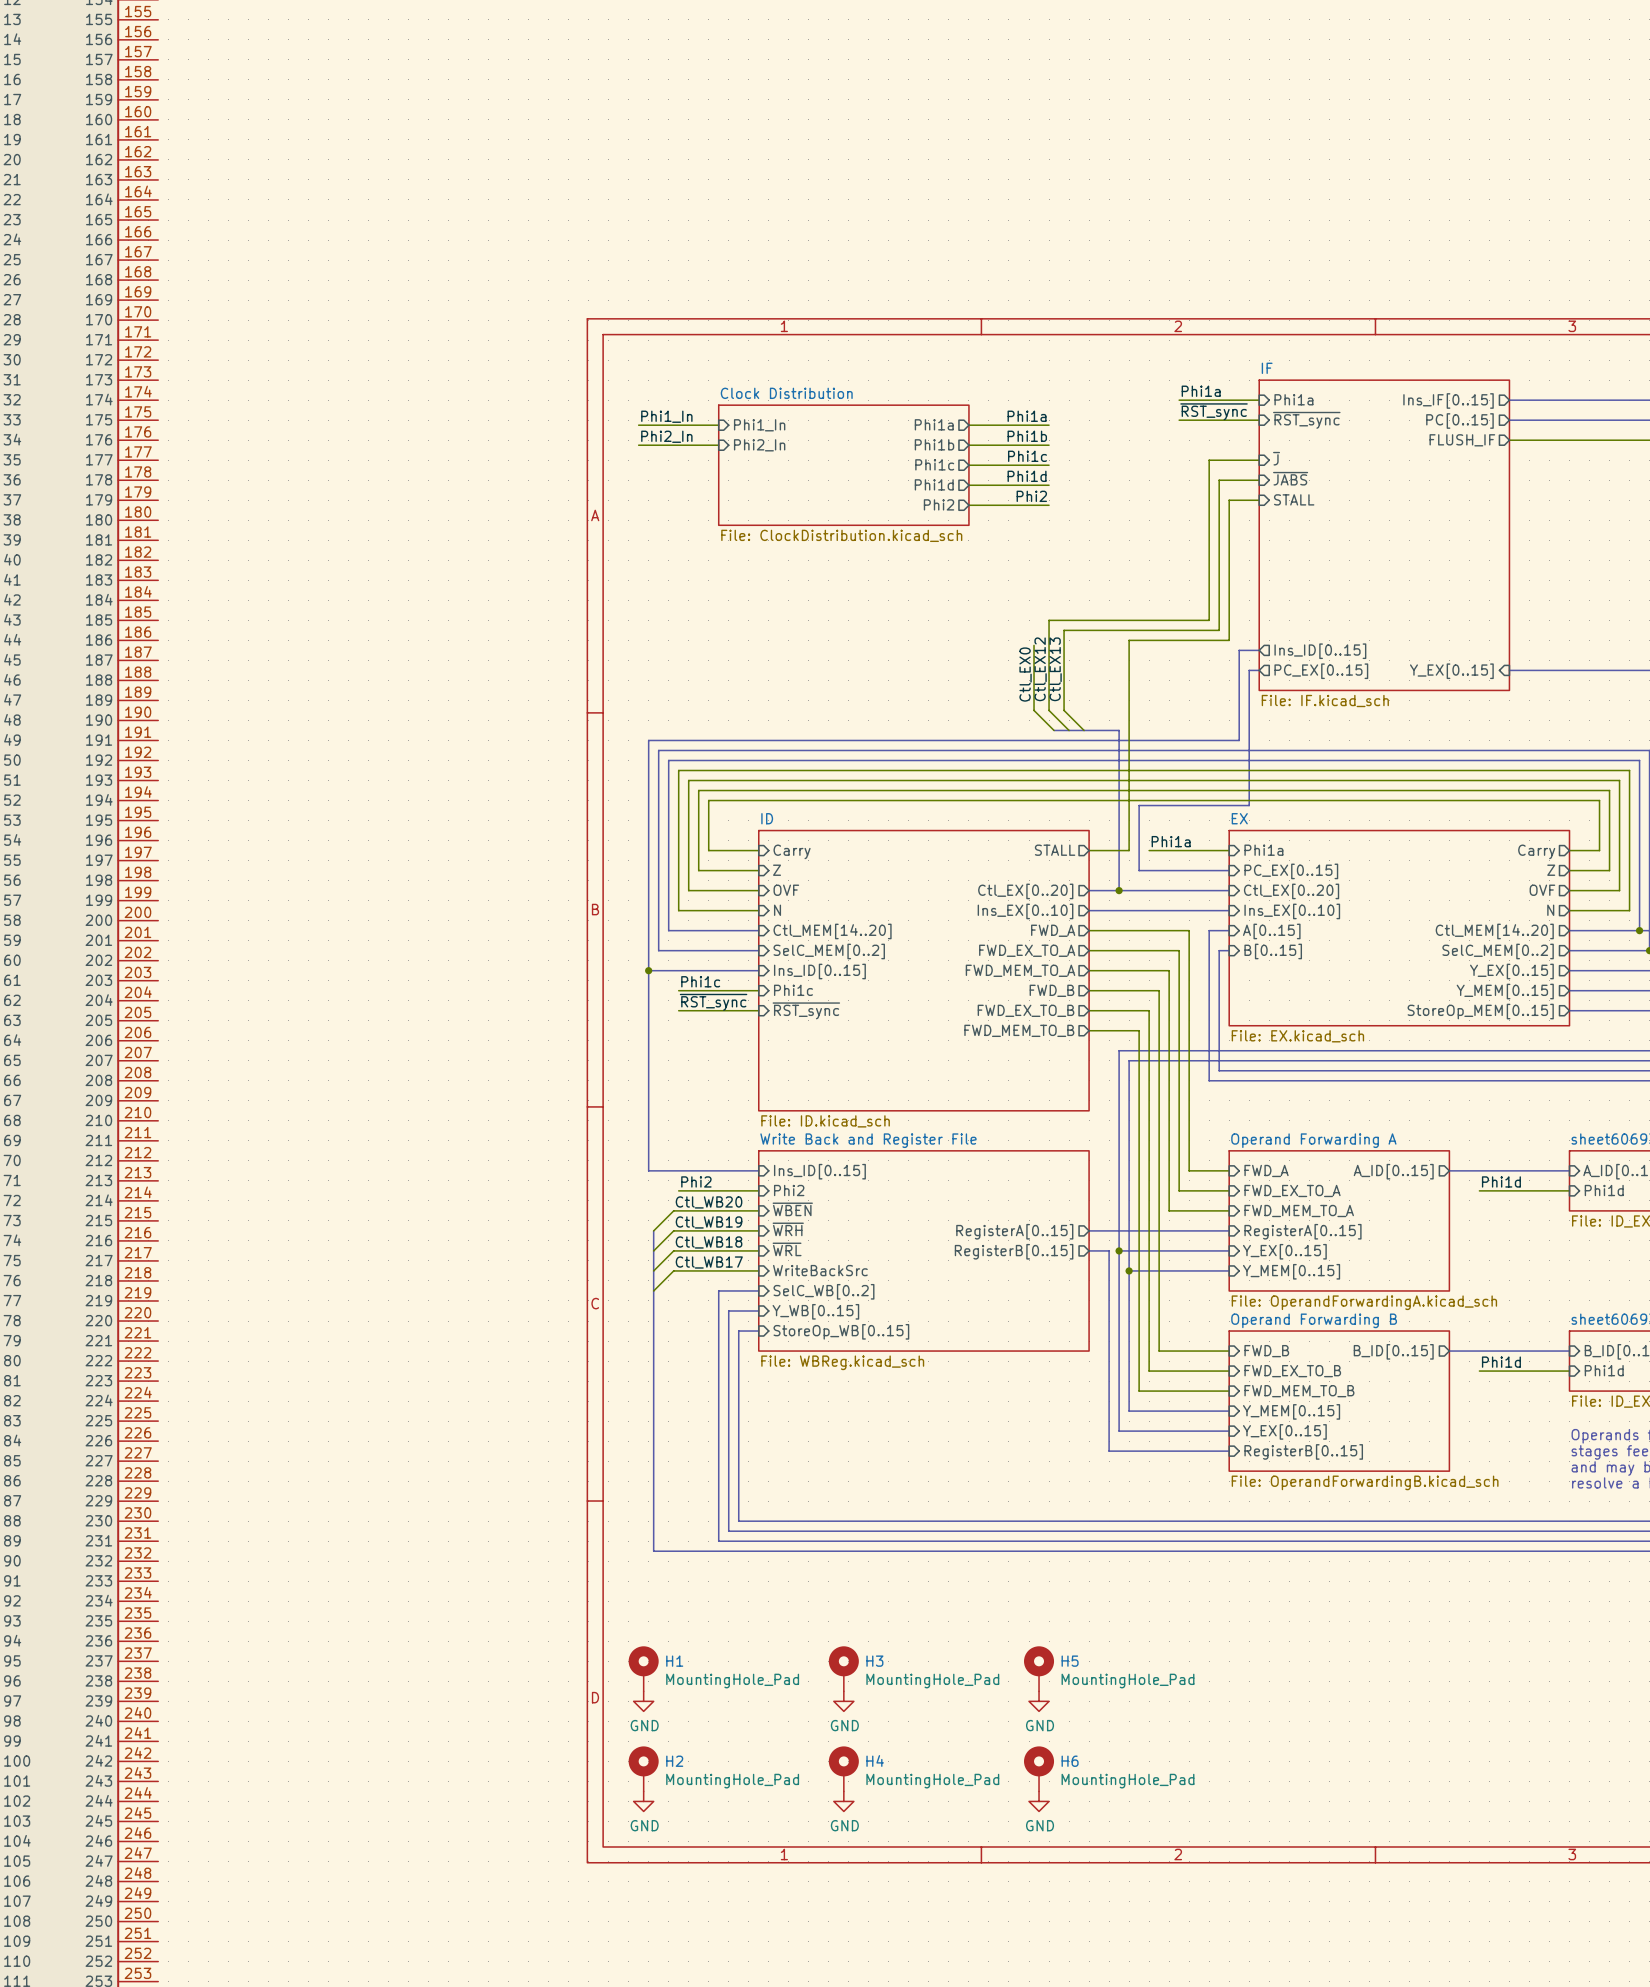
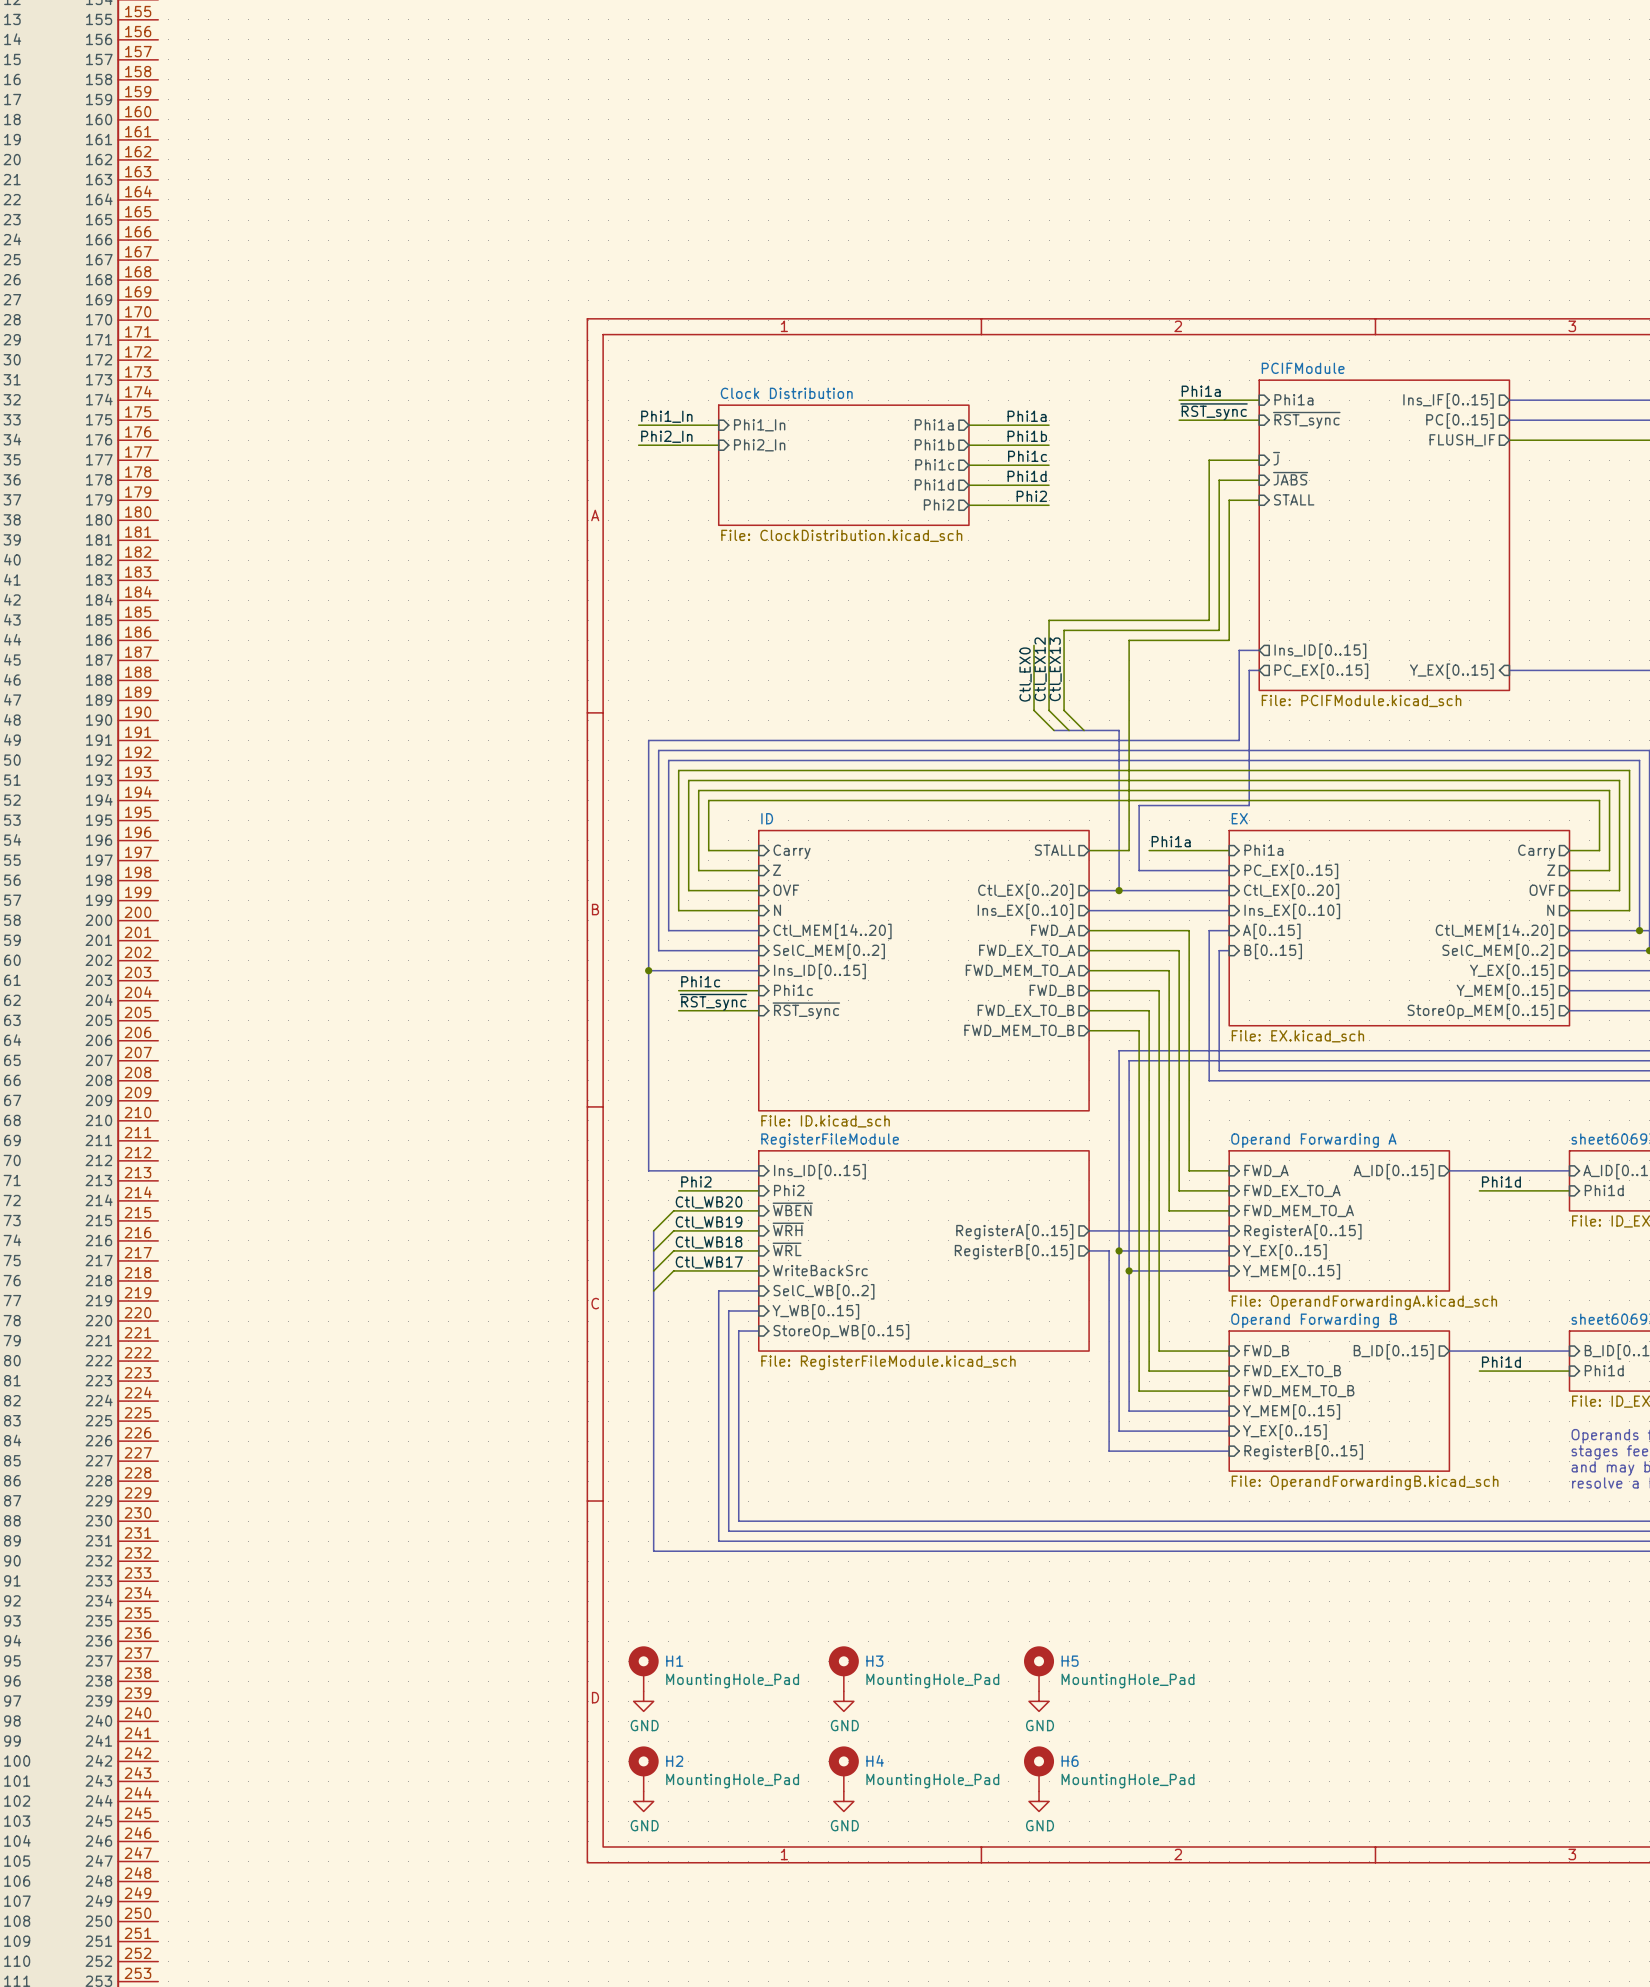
sheet IF: File: IF.kicad_sch (1384, 535) -> none
sheet PCIFModule: none -> File: PCIFModule.kicad_sch (1384, 535)
sheet Write Back and Register File name: Write Back and Register File (868, 1140) -> RegisterFileModule (830, 1140)
sheet Write Back and Register File value: File: WBReg.kicad_sch (842, 1362) -> File: RegisterFileModule.kicad_sch (888, 1362)

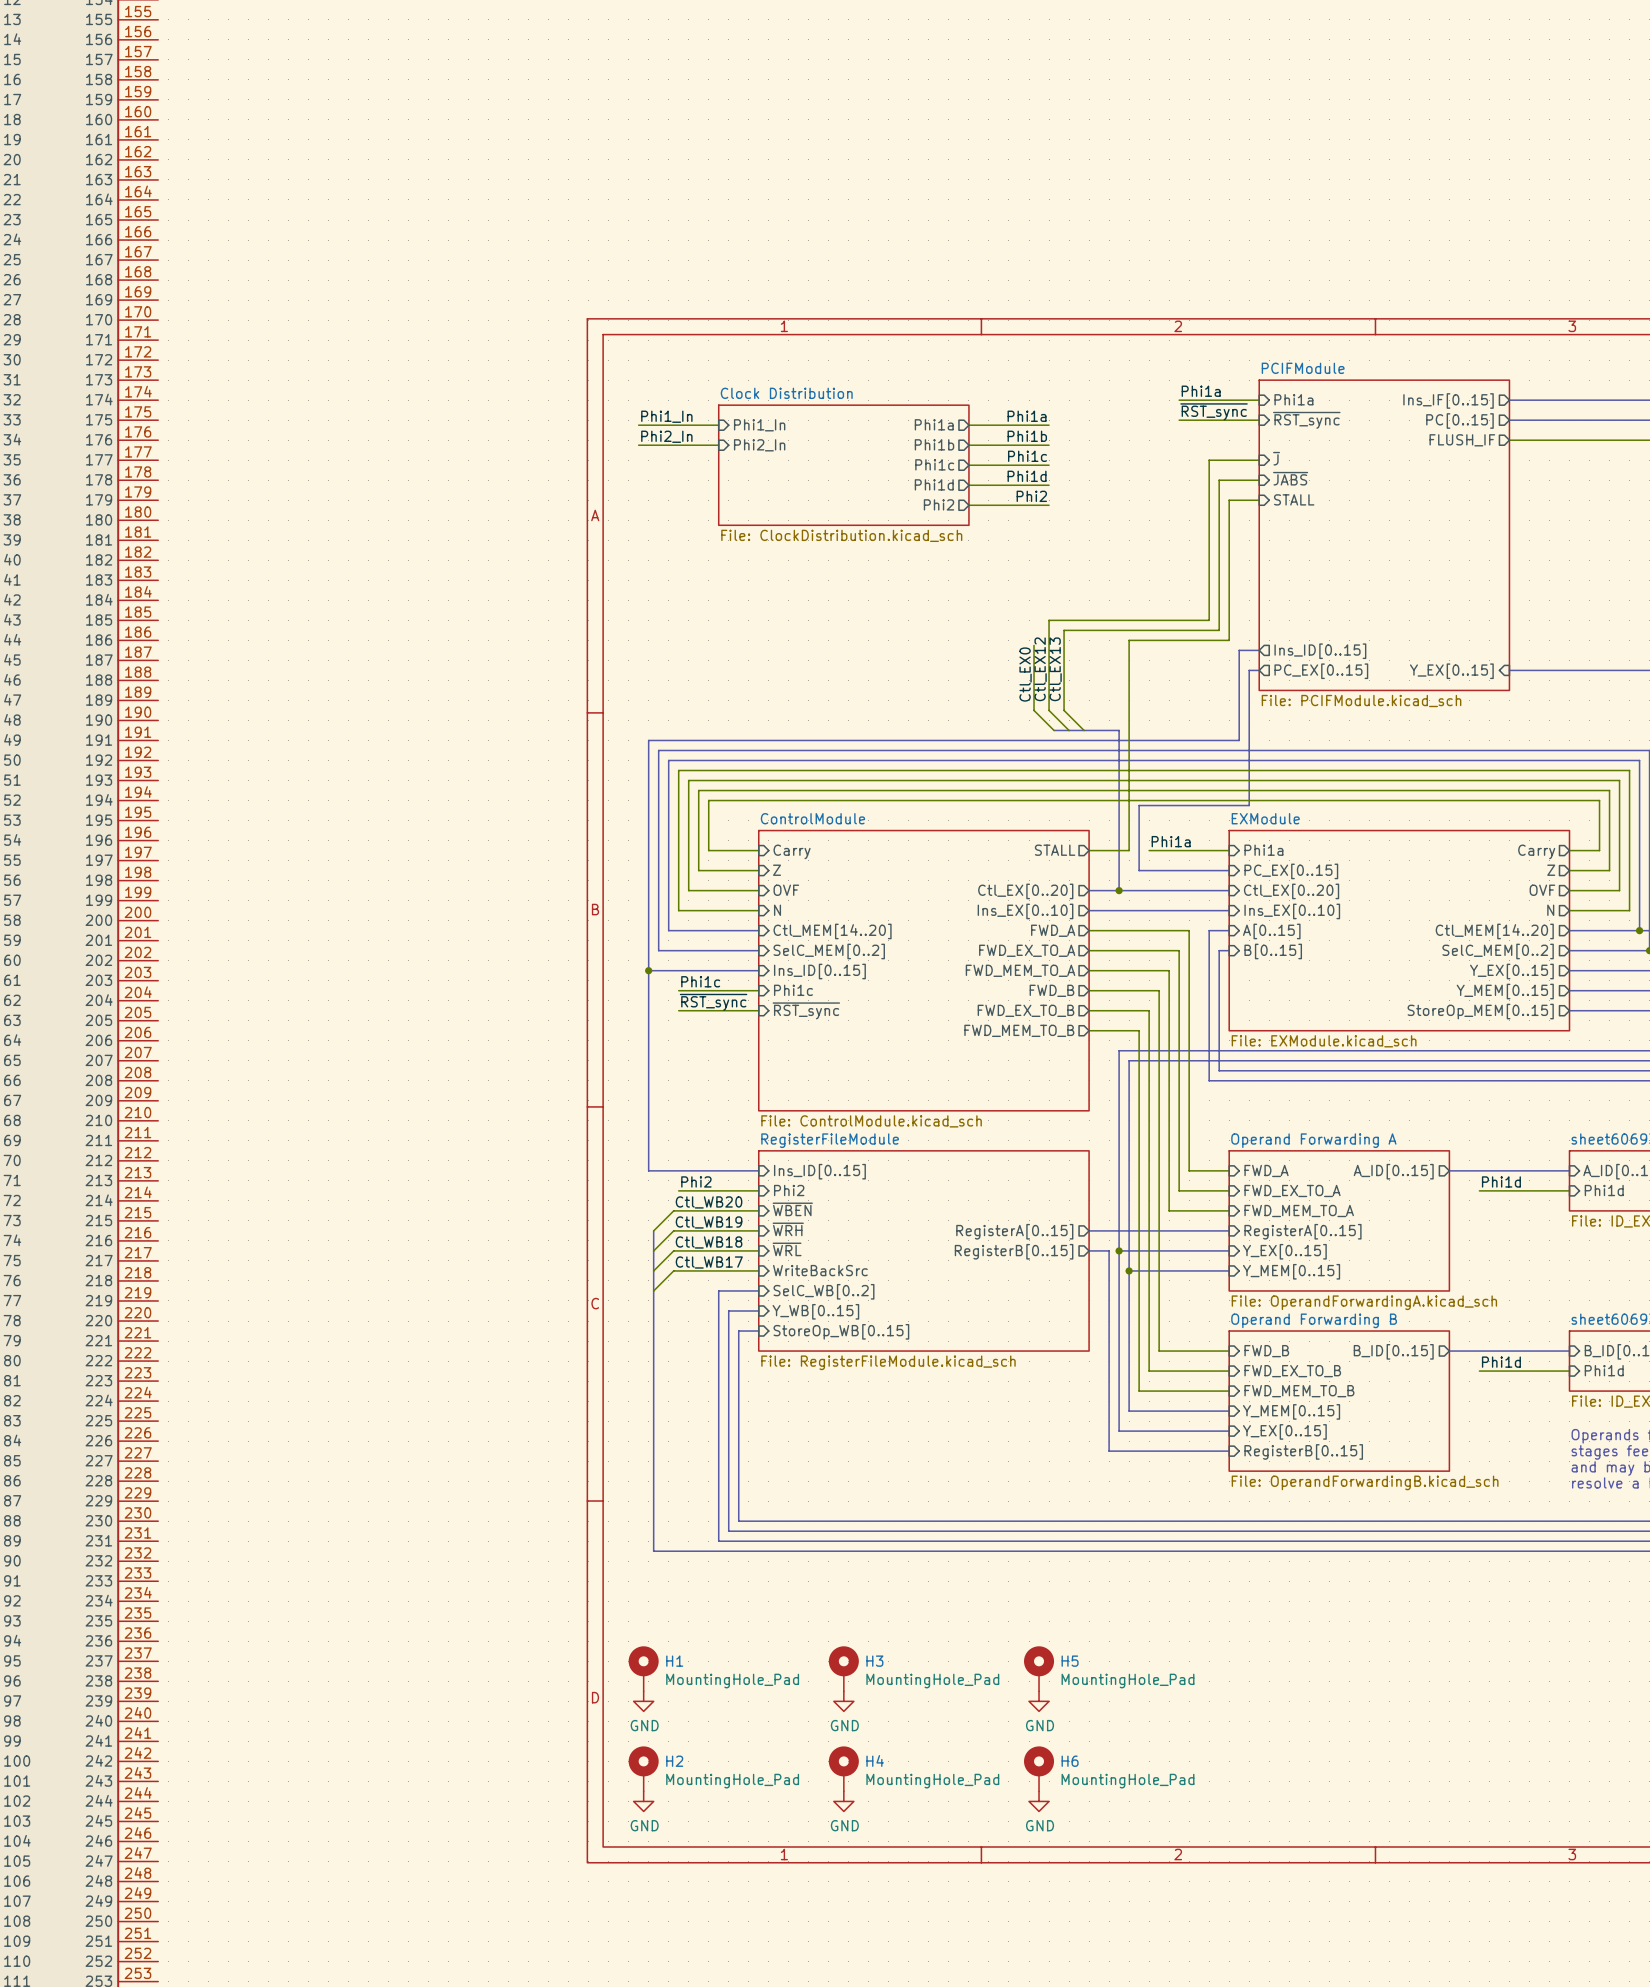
sheet EX: File: EX.kicad_sch (1399, 928) -> none
sheet EXModule: none -> File: EXModule.kicad_sch (1399, 930)
sheet ID: File: ID.kicad_sch (923, 970) -> none
sheet ControlModule: none -> File: ControlModule.kicad_sch (923, 970)

